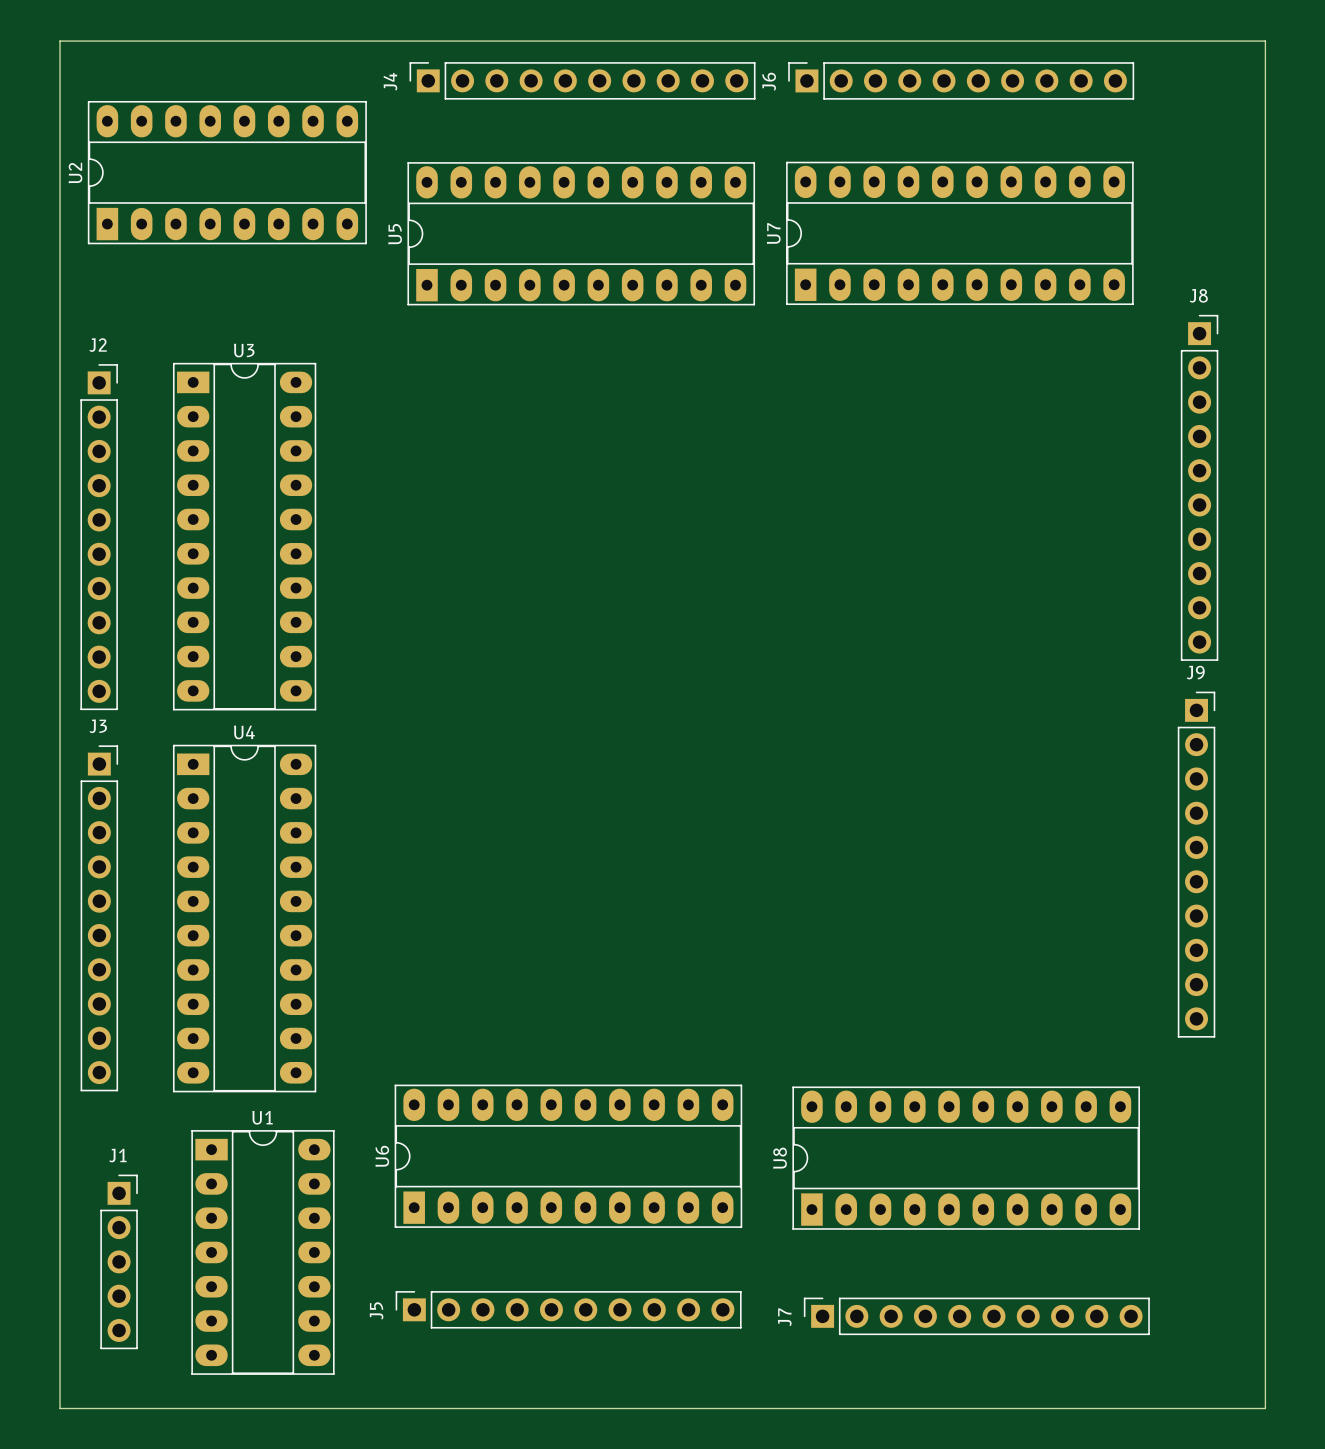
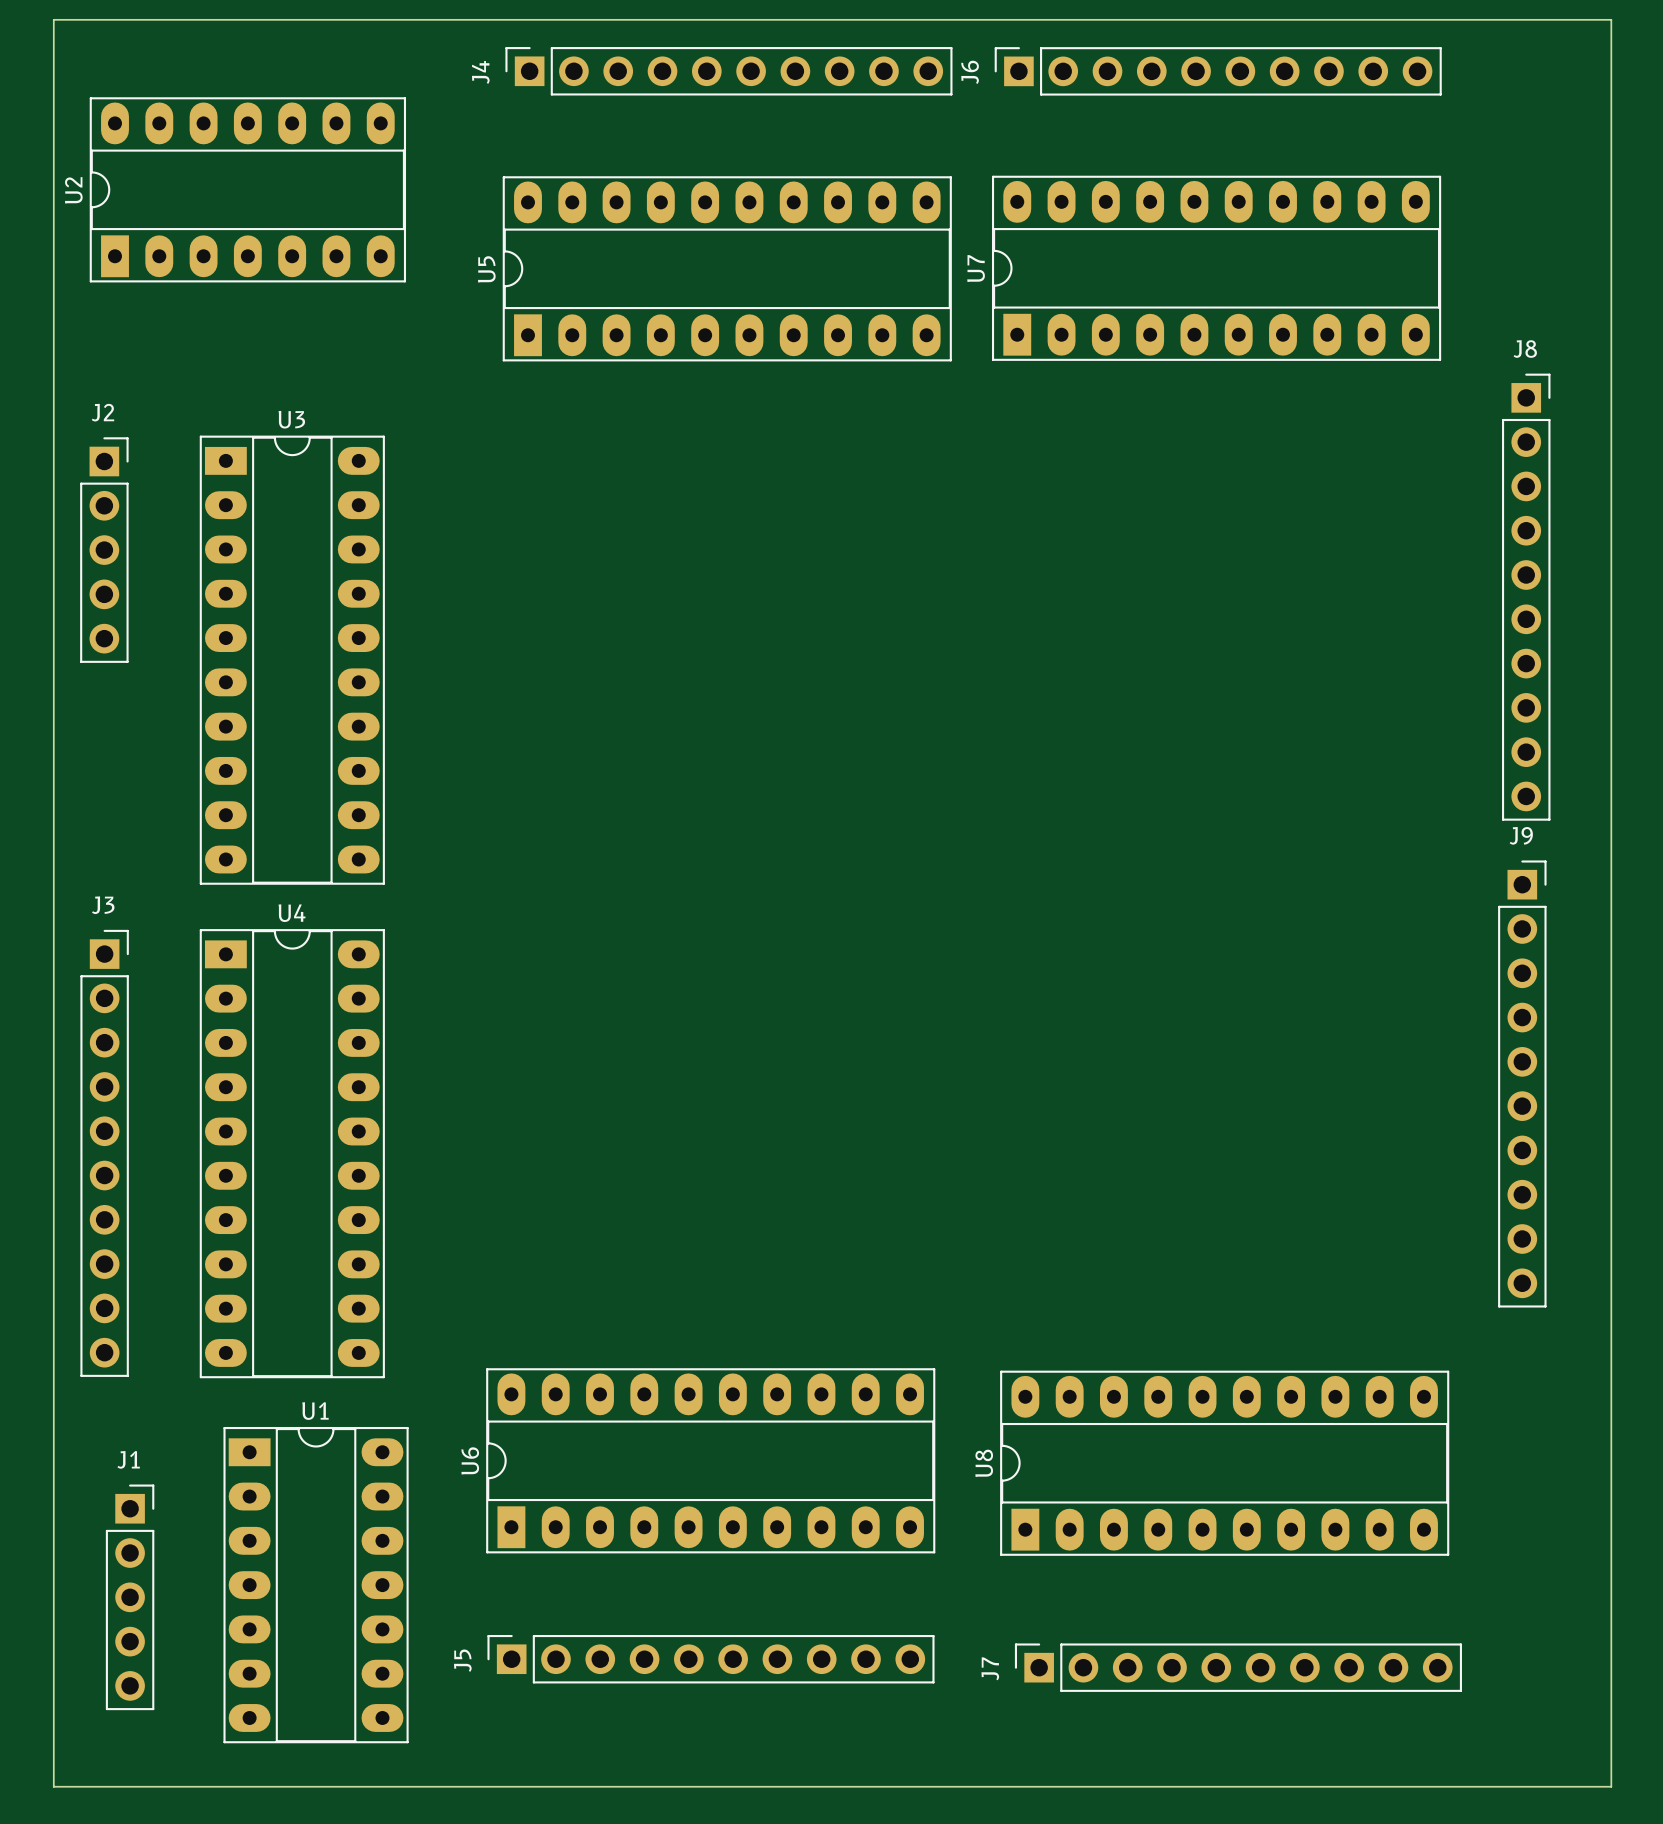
U2 footprint: [87, 100, 367, 245] -> [89, 97, 407, 283]
J2 footprint: [80, 364, 118, 711] -> [80, 437, 129, 663]

